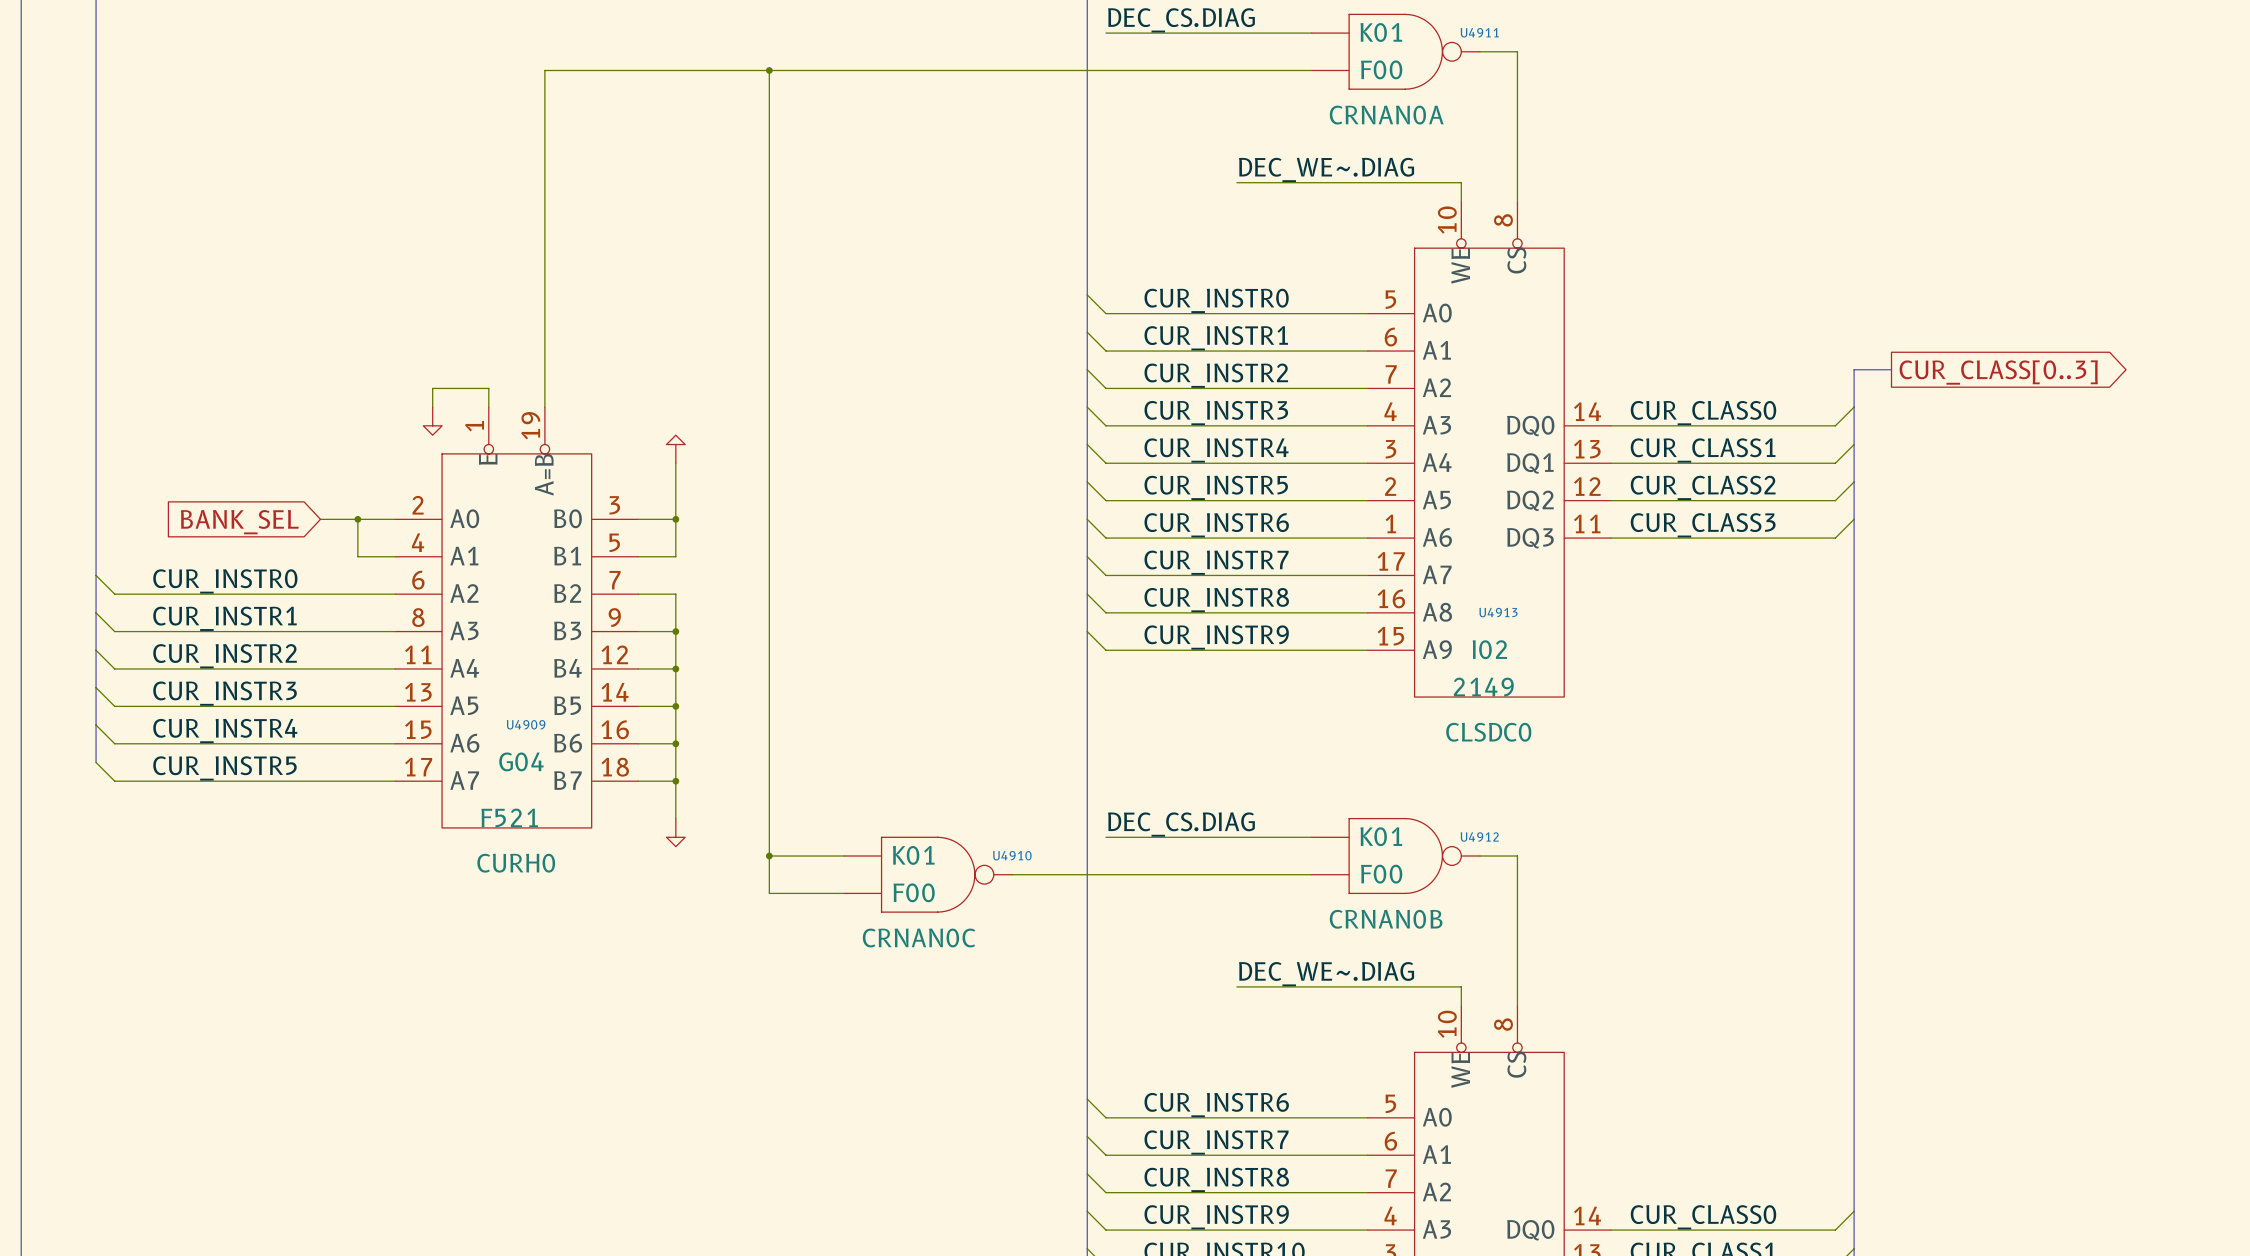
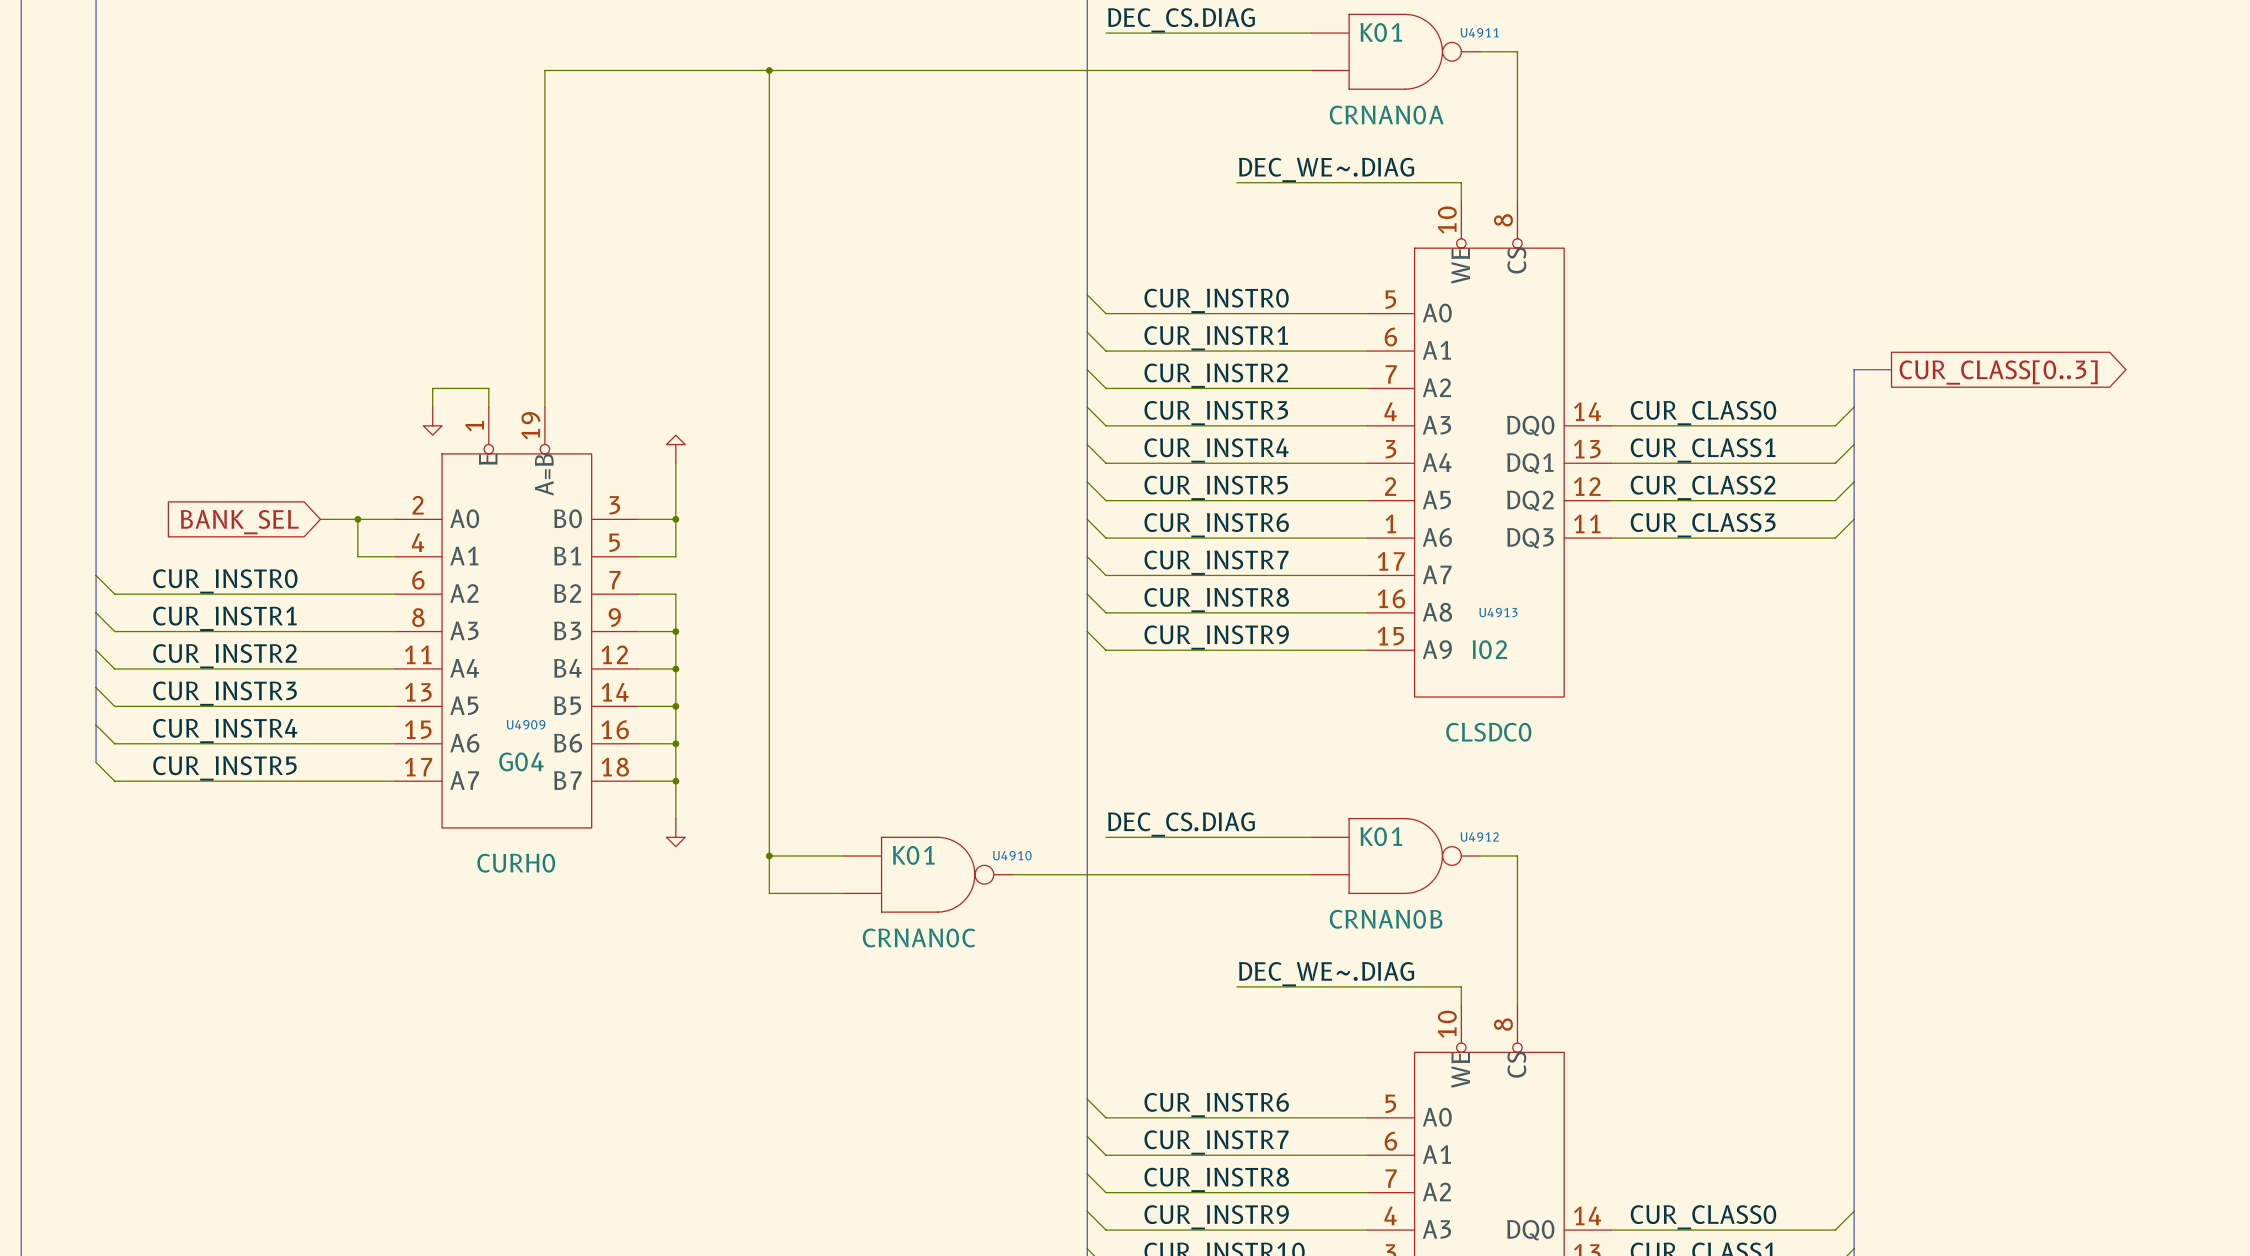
U4911 value: F00 (1381, 69) -> none
U4913 value: 2149 (1483, 687) -> none
U4909 value: F521 (509, 817) -> none
U4912 value: F00 (1381, 874) -> none
U4910 value: F00 (914, 892) -> none

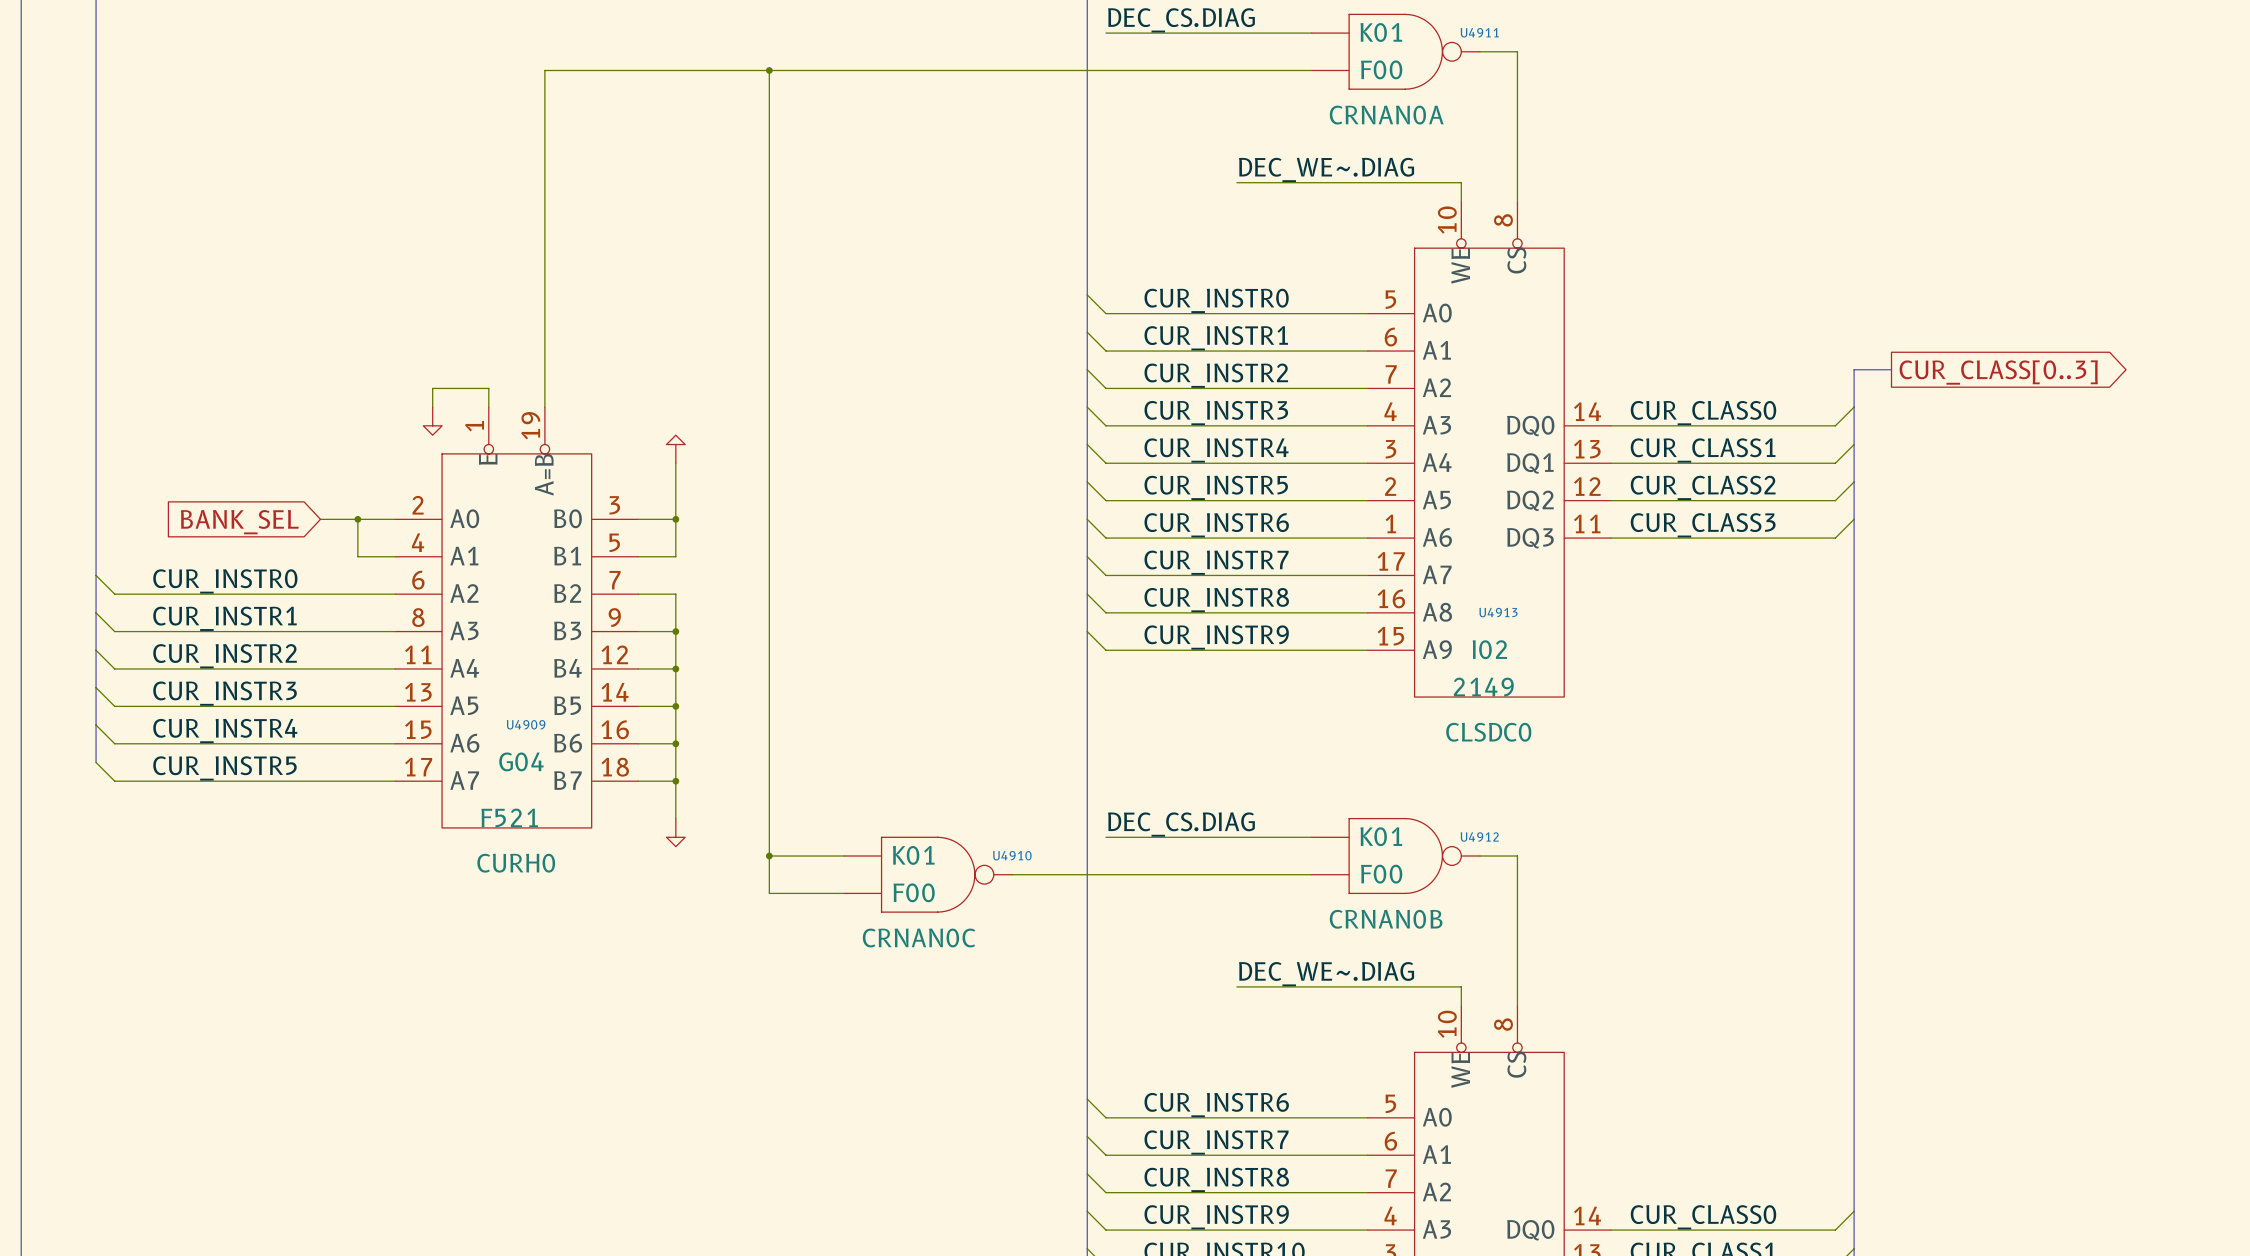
U4911 value: none -> F00 (1381, 69)
U4913 value: none -> 2149 (1483, 687)
U4909 value: none -> F521 (509, 817)
U4912 value: none -> F00 (1381, 874)
U4910 value: none -> F00 (914, 892)

